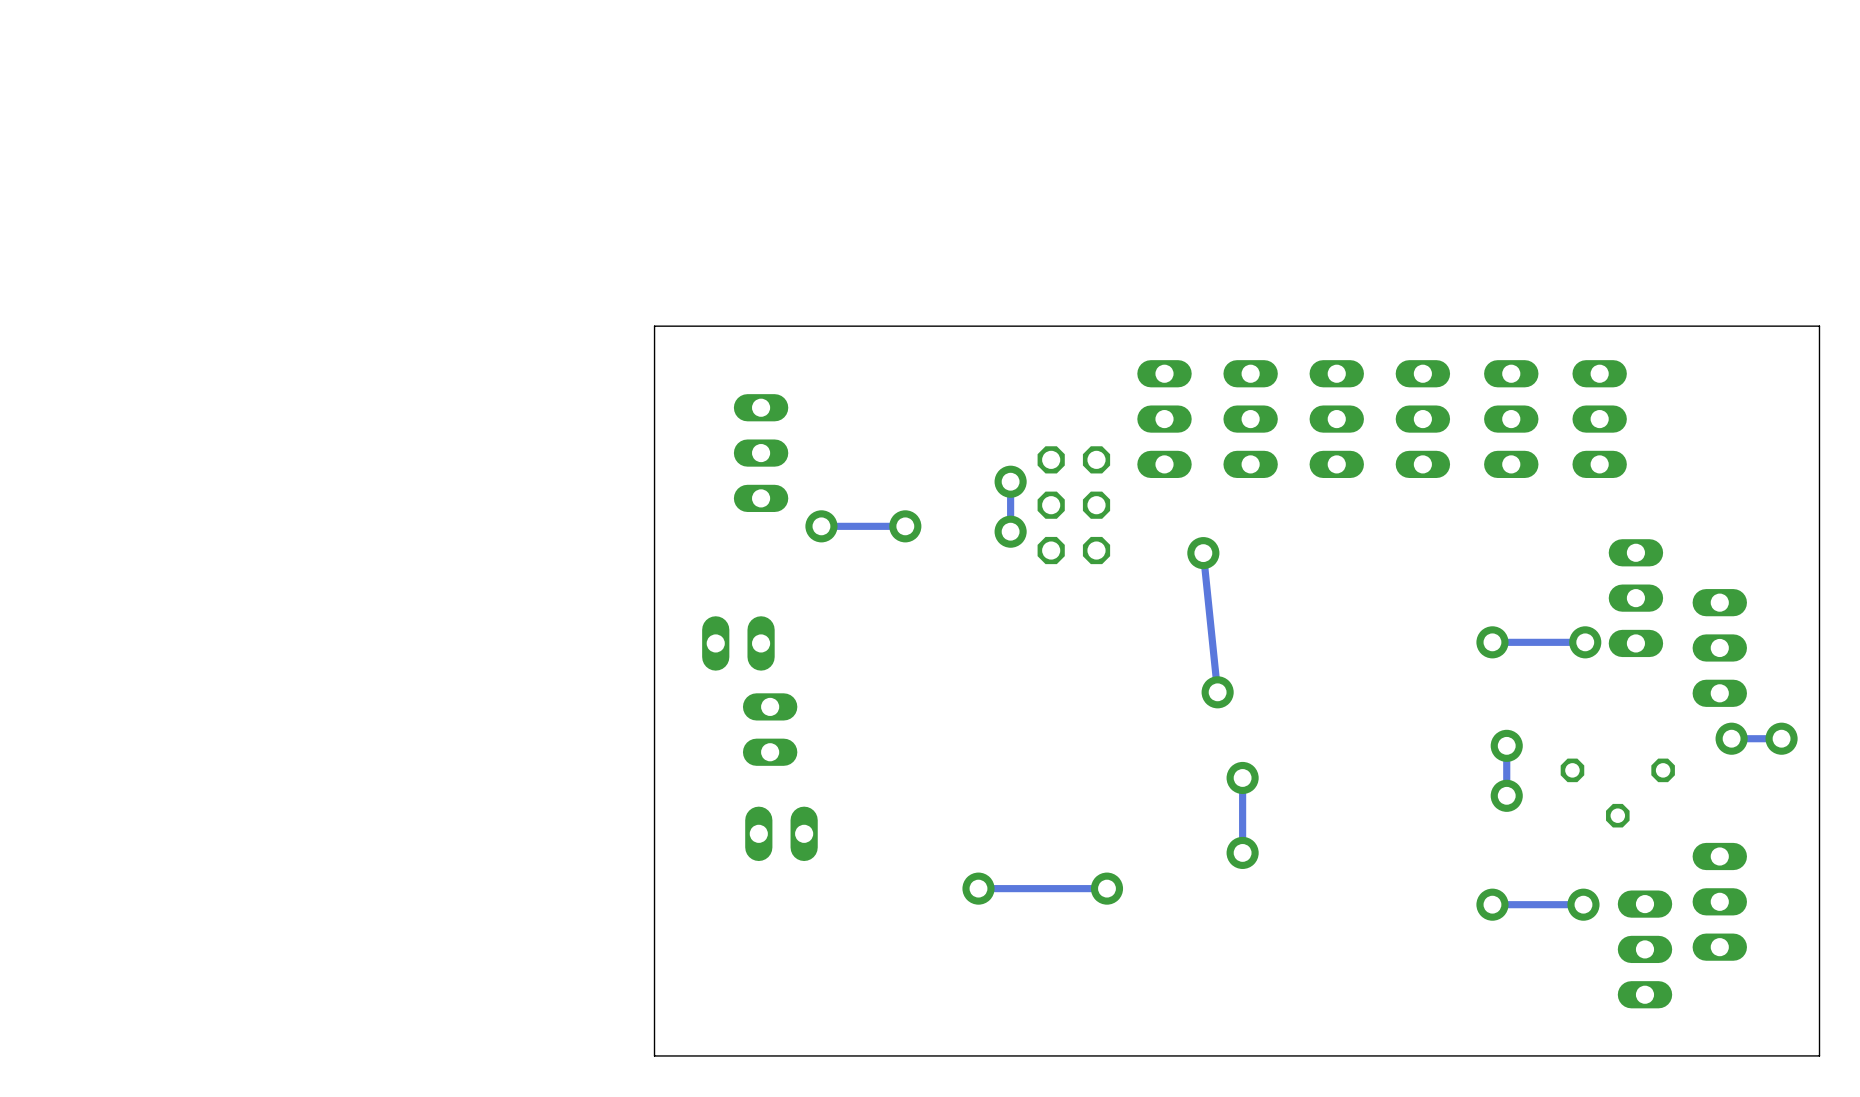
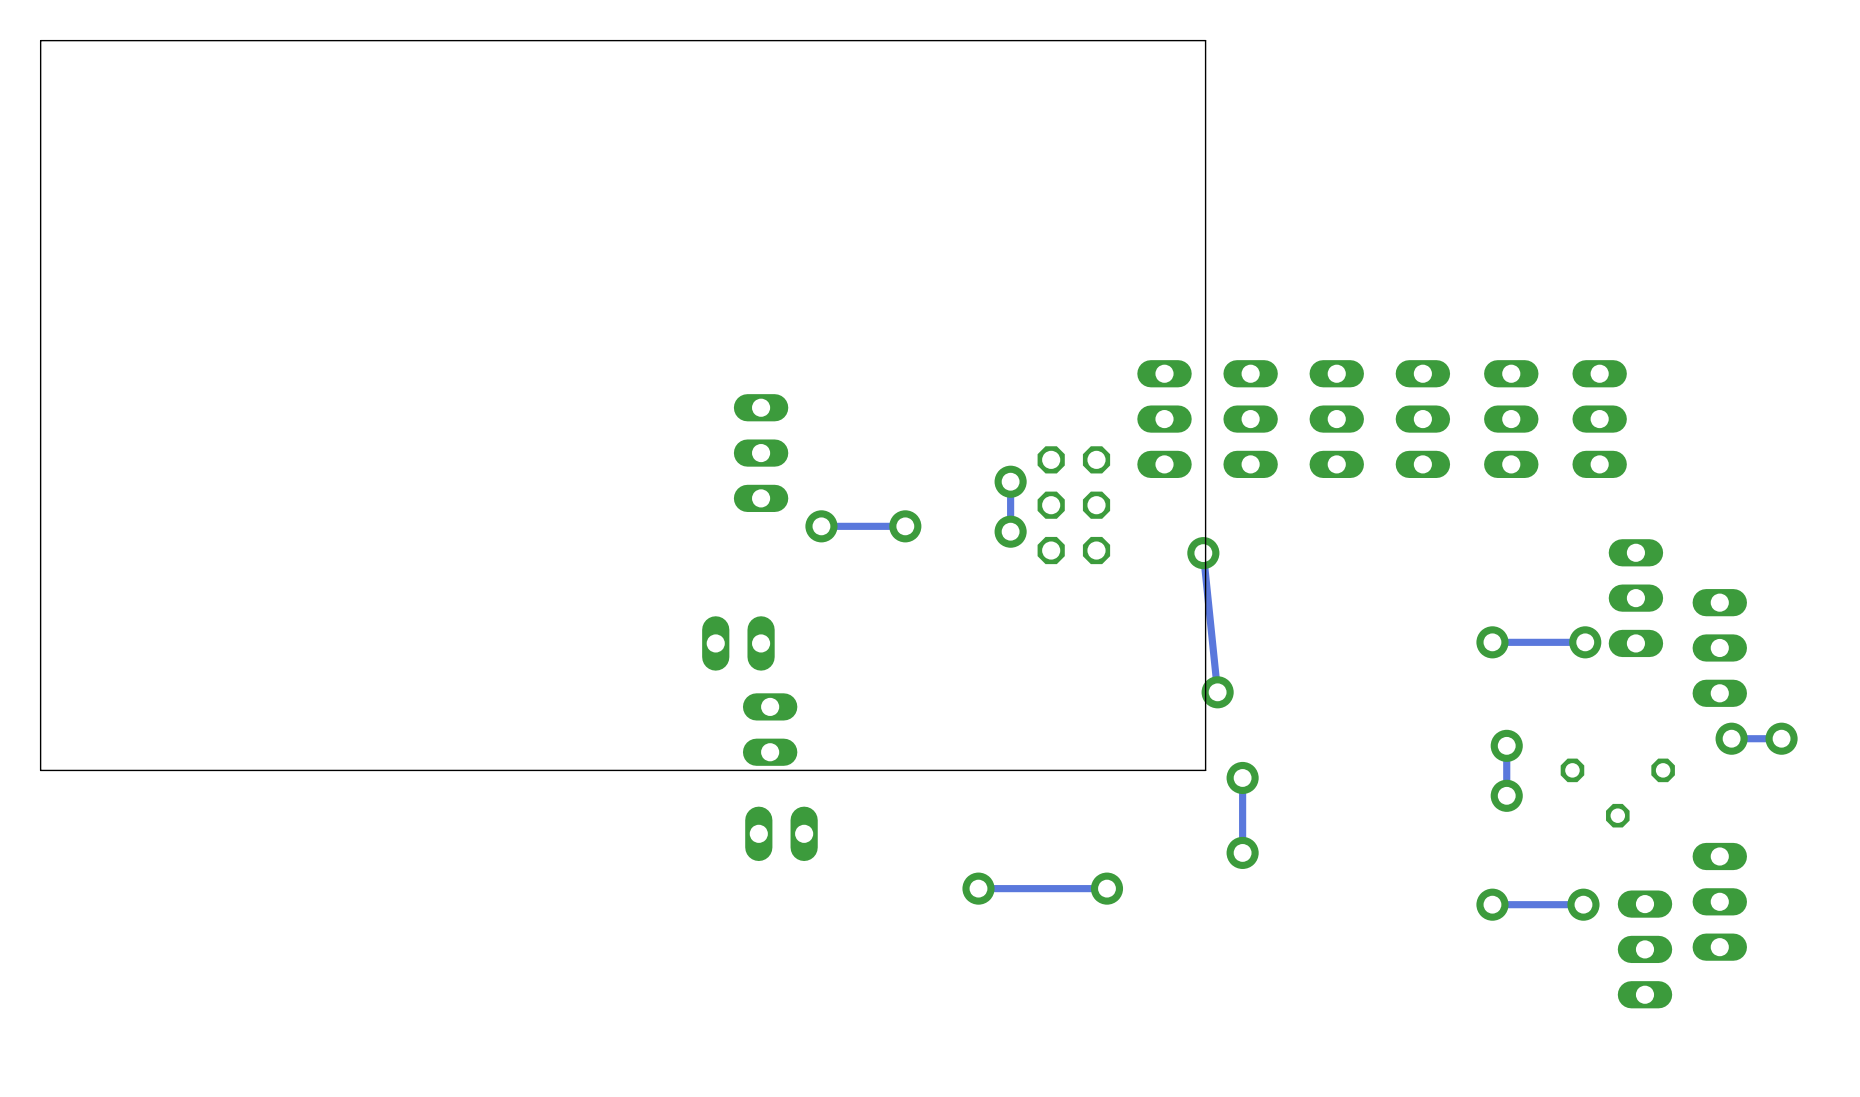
board edge: none -> (1205, 40) (40, 40) (40, 770) (1205, 770) (1205, 40)
board edge: (1819, 326) (654, 326) (654, 1055) (1819, 1055) (1819, 326) -> none

